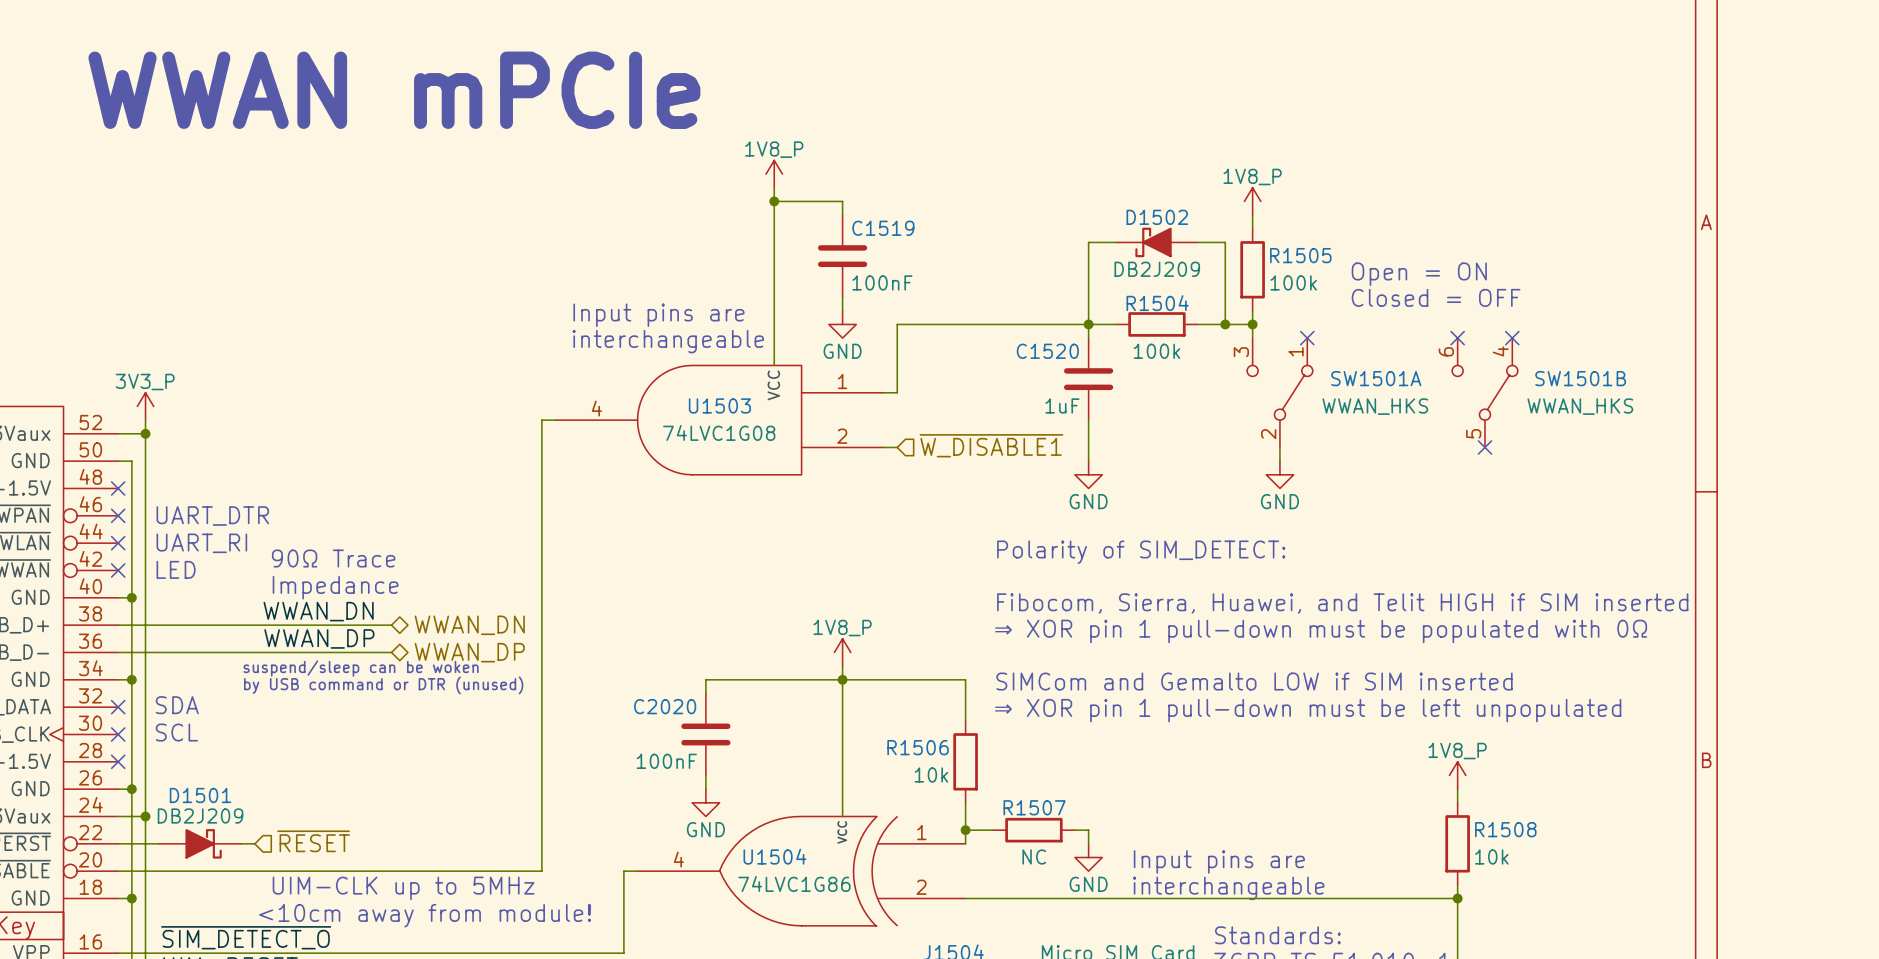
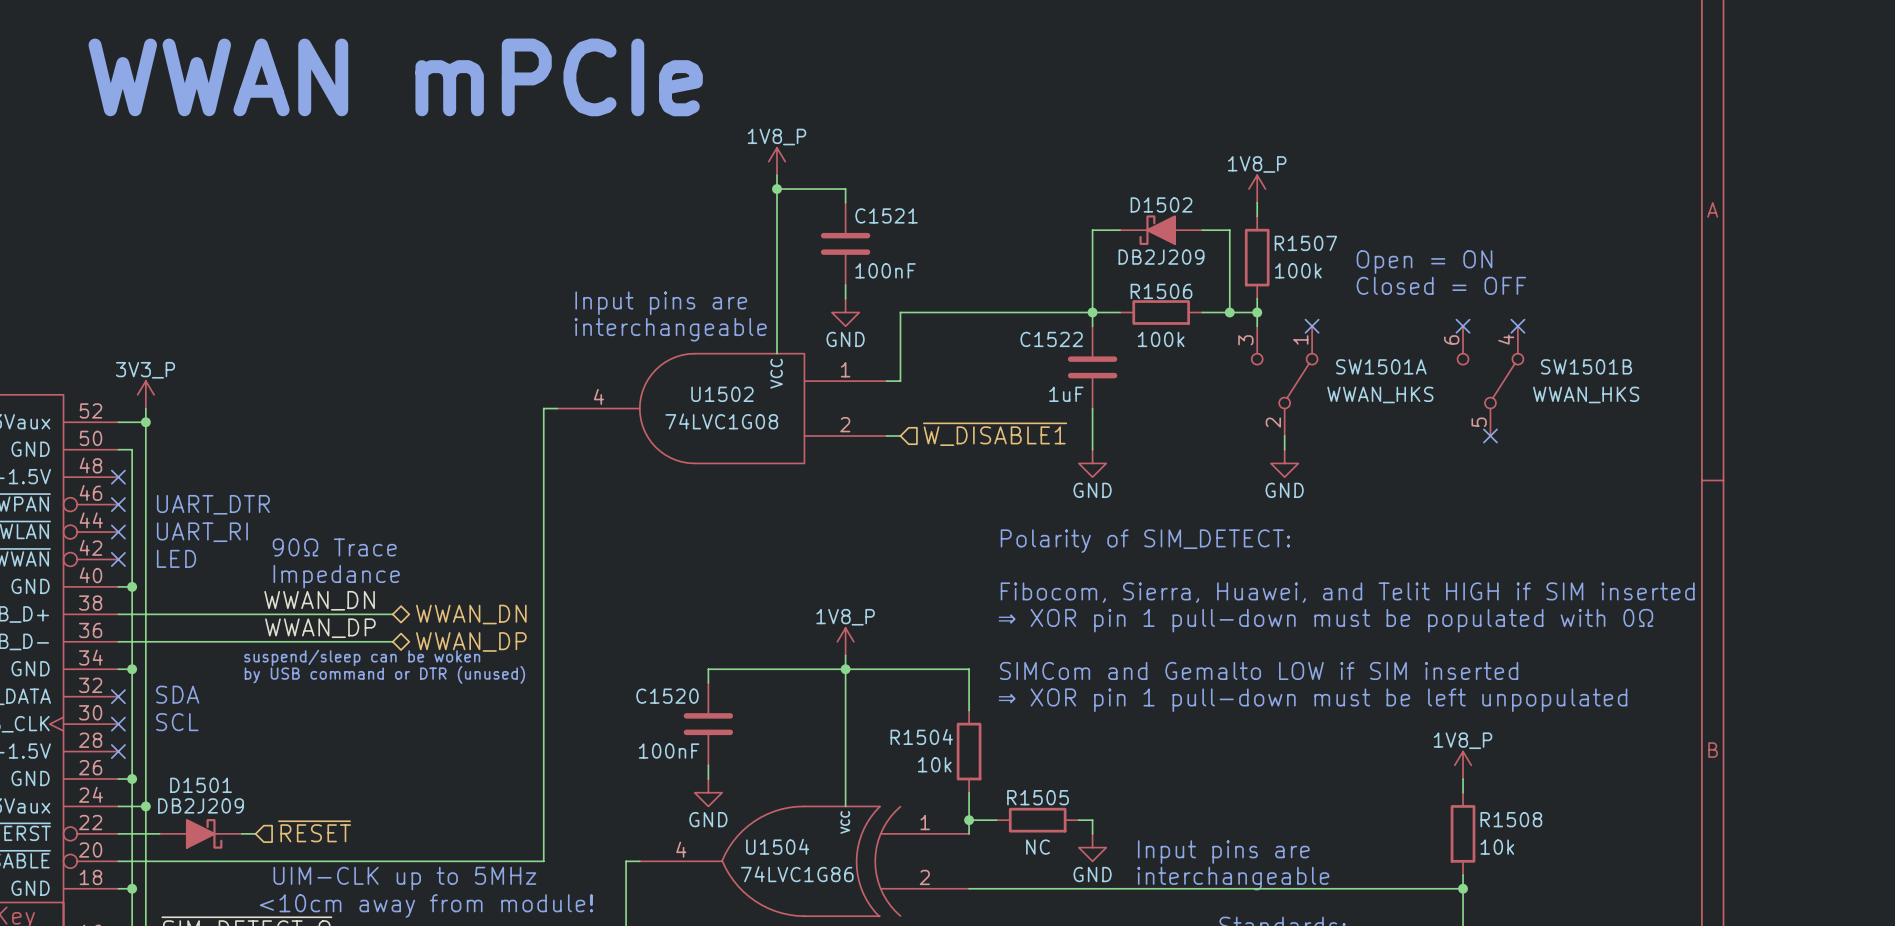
C1519 name: C1519 (883, 228) -> C1521 (886, 215)
R1505 name: R1505 (1300, 255) -> R1507 (1305, 243)
R1504 name: R1504 (1157, 303) -> R1506 (1161, 291)
C1520 name: C1520 (1047, 351) -> C1522 (1051, 339)
U1503 name: U1503 (719, 405) -> U1502 (722, 394)
C2020 name: C2020 (665, 706) -> C1520 (667, 696)
R1506 name: R1506 (918, 747) -> R1504 (921, 737)
R1507 name: R1507 (1034, 807) -> R1505 (1038, 797)

